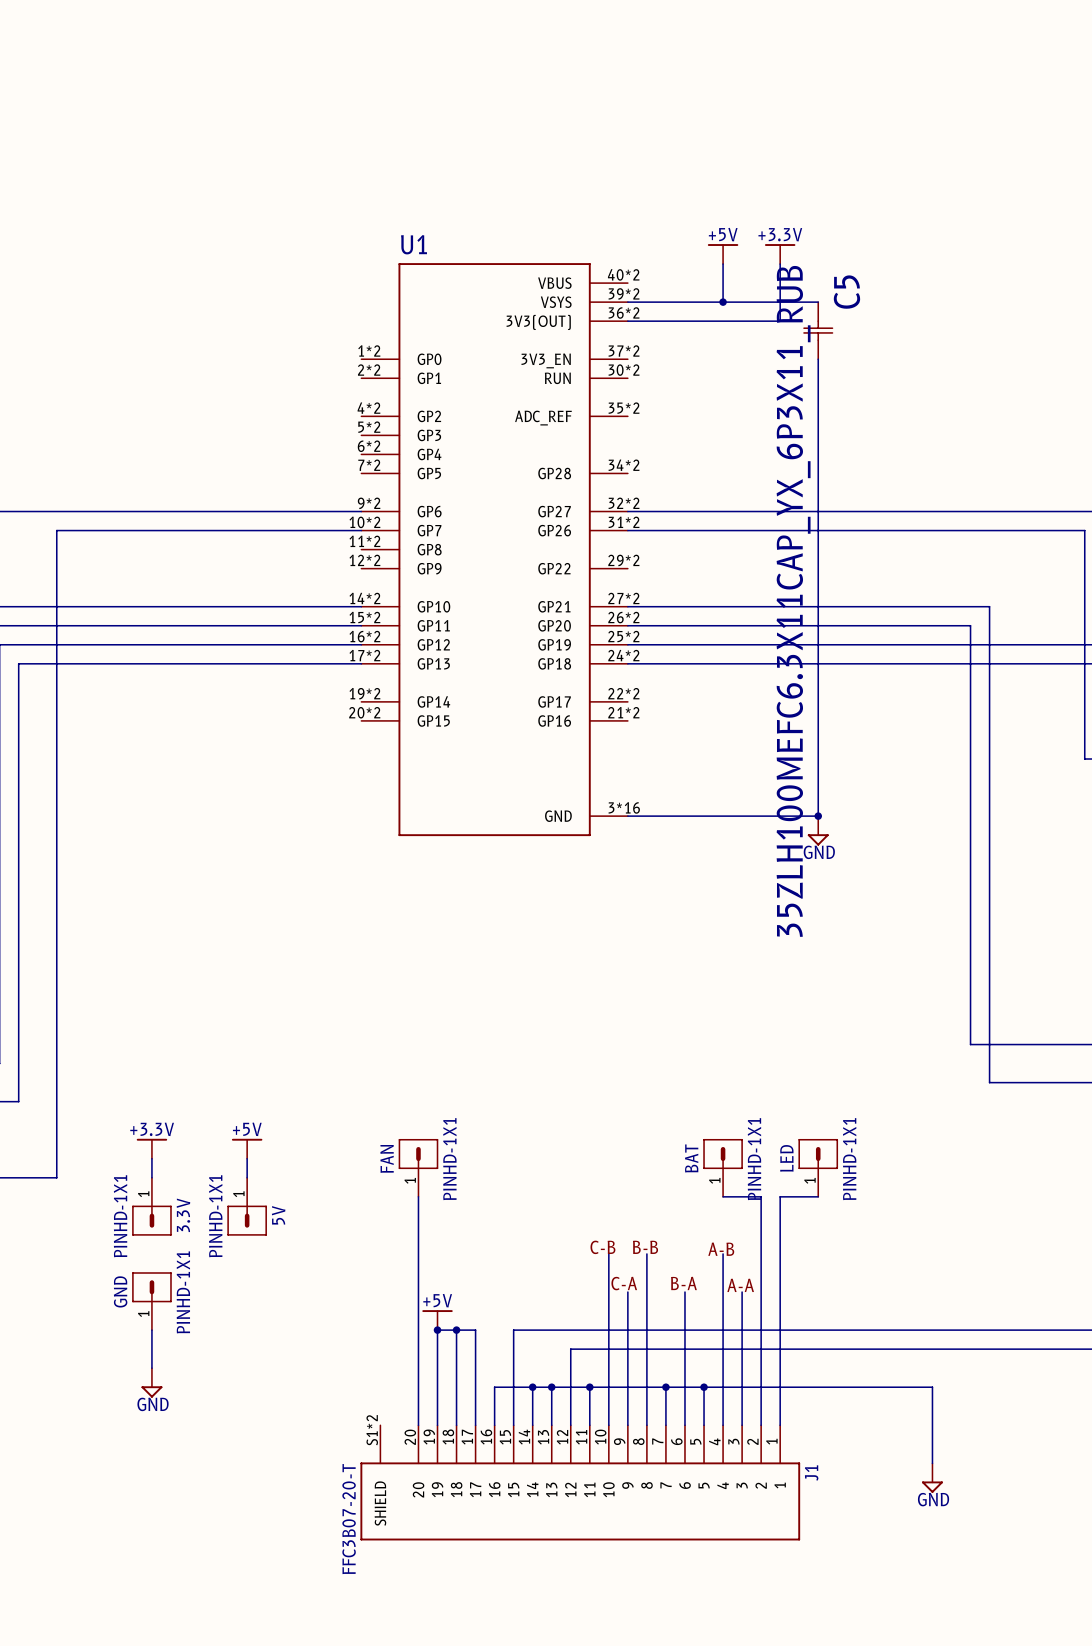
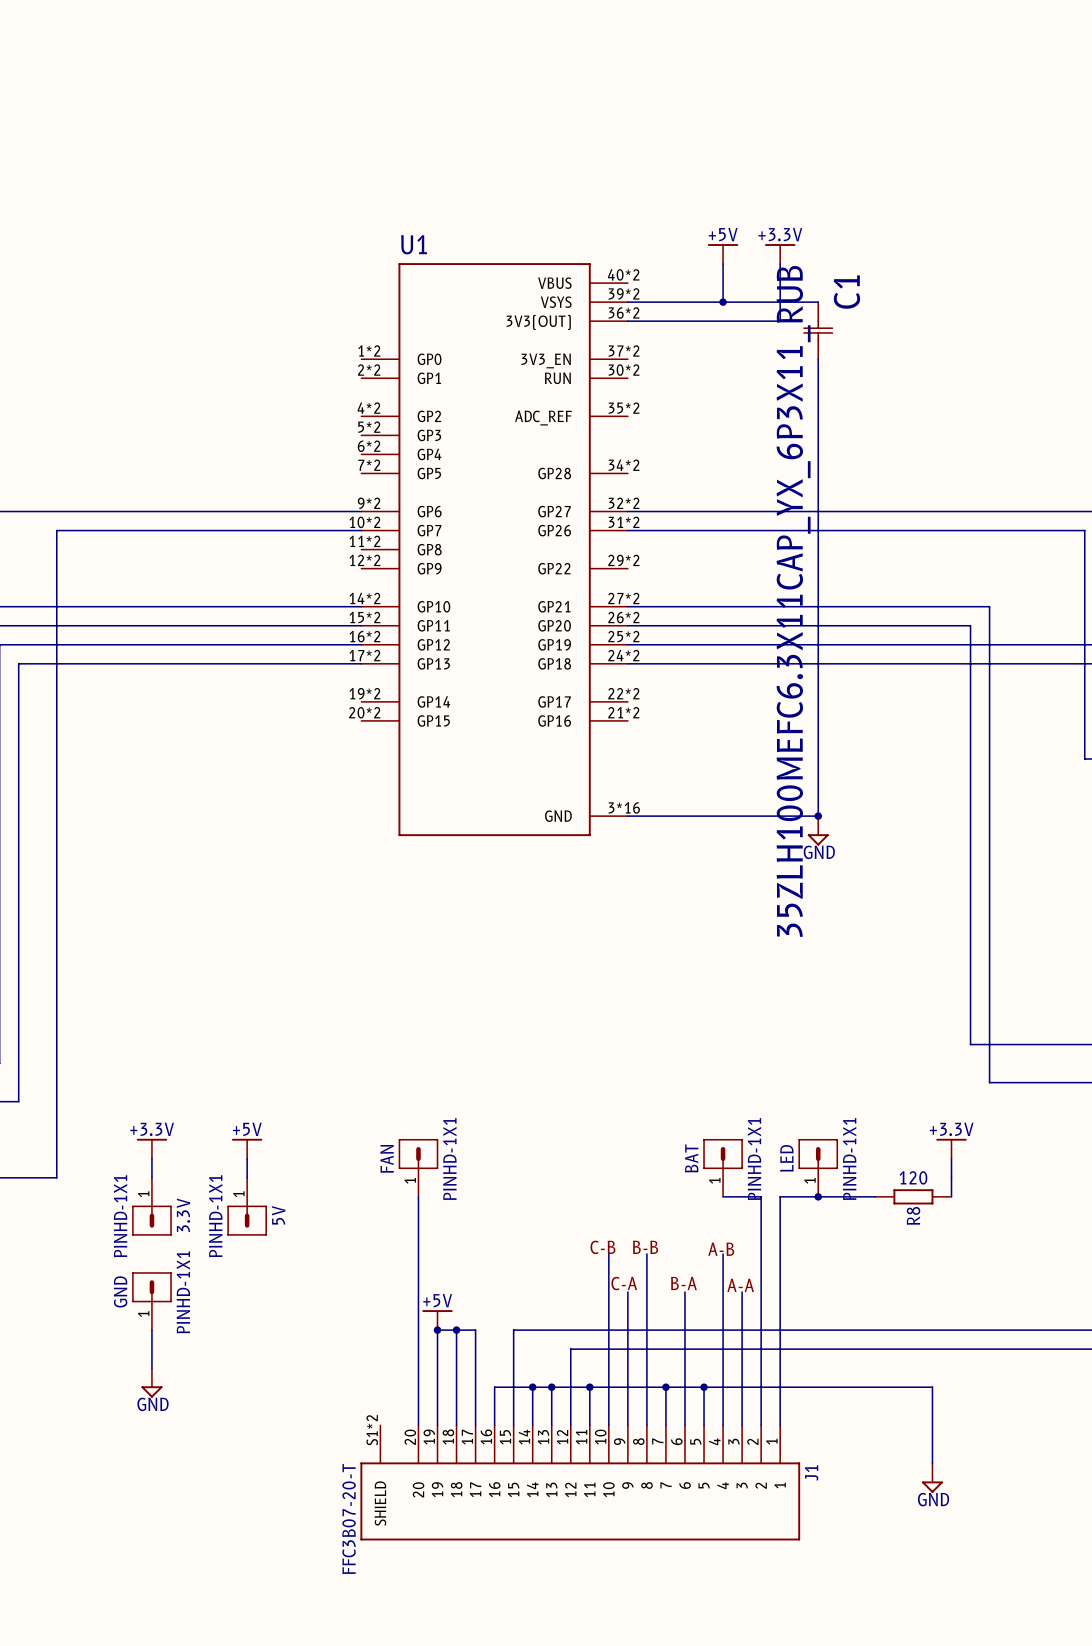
C5 name: C5 (846, 292) -> C1 (846, 292)
power symbol: none -> +3.3V (951, 1148)
wire: none -> (951, 1158) (951, 1196)
wire: none -> (818, 1196) (875, 1196)
junction: none -> (818, 1196)
R8: none -> 120 (913, 1196)

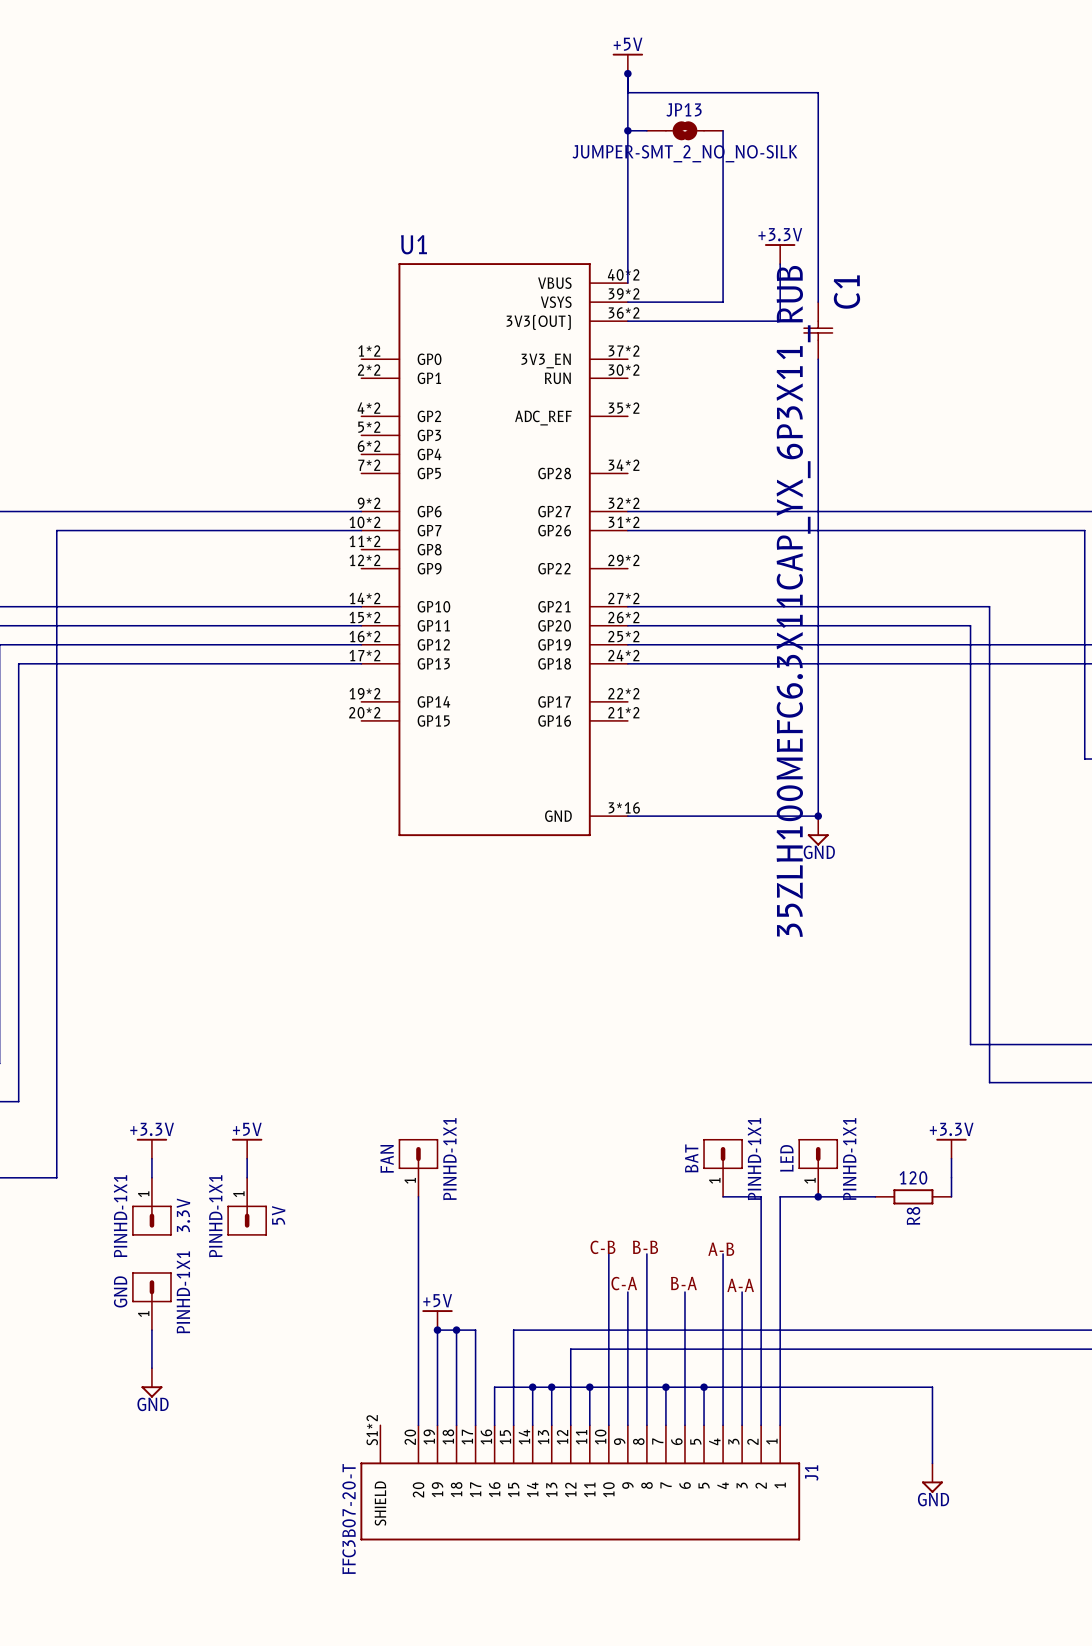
power symbol: none -> +5V (627, 63)
wire: none -> (627, 73) (627, 283)
junction: none -> (627, 73)
wire: none -> (627, 130) (646, 130)
junction: none -> (627, 130)
JP13: none -> JUMPER-SMT_2_NO_NO-SILK (684, 130)
wire: none -> (723, 130) (723, 264)
power symbol: +5V (723, 254) -> none
wire: (723, 302) (818, 302) -> (627, 92) (818, 92) (818, 302)
junction: (723, 302) -> none

